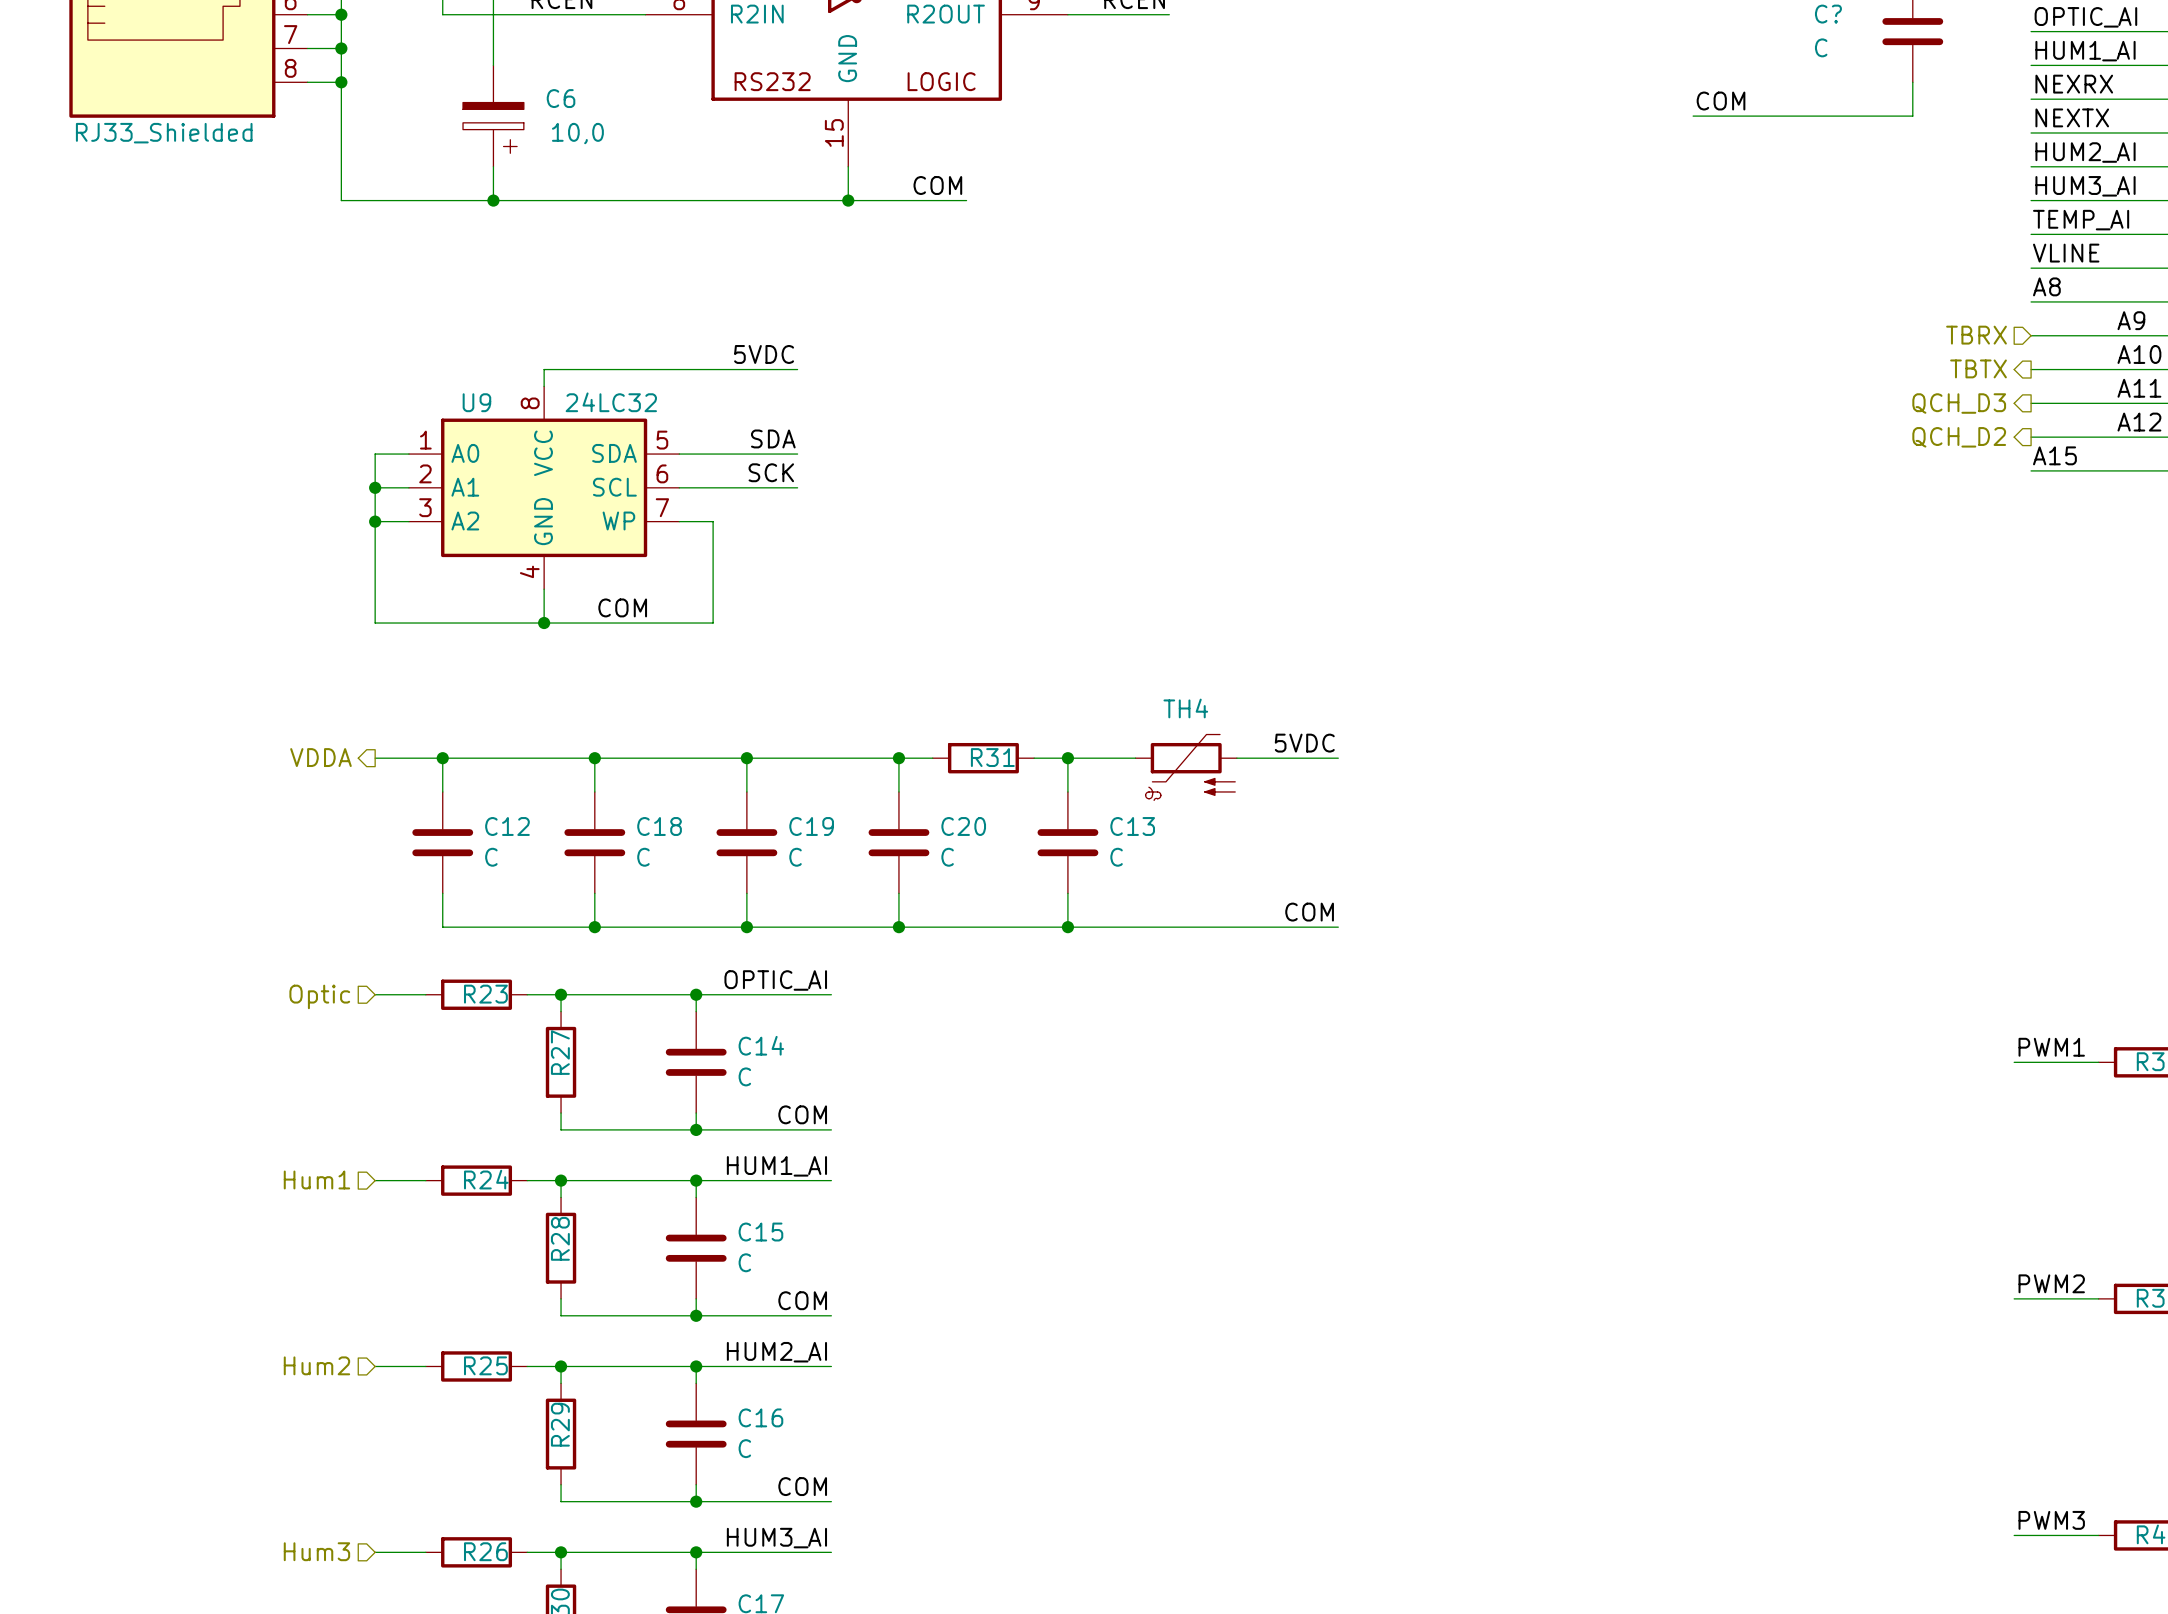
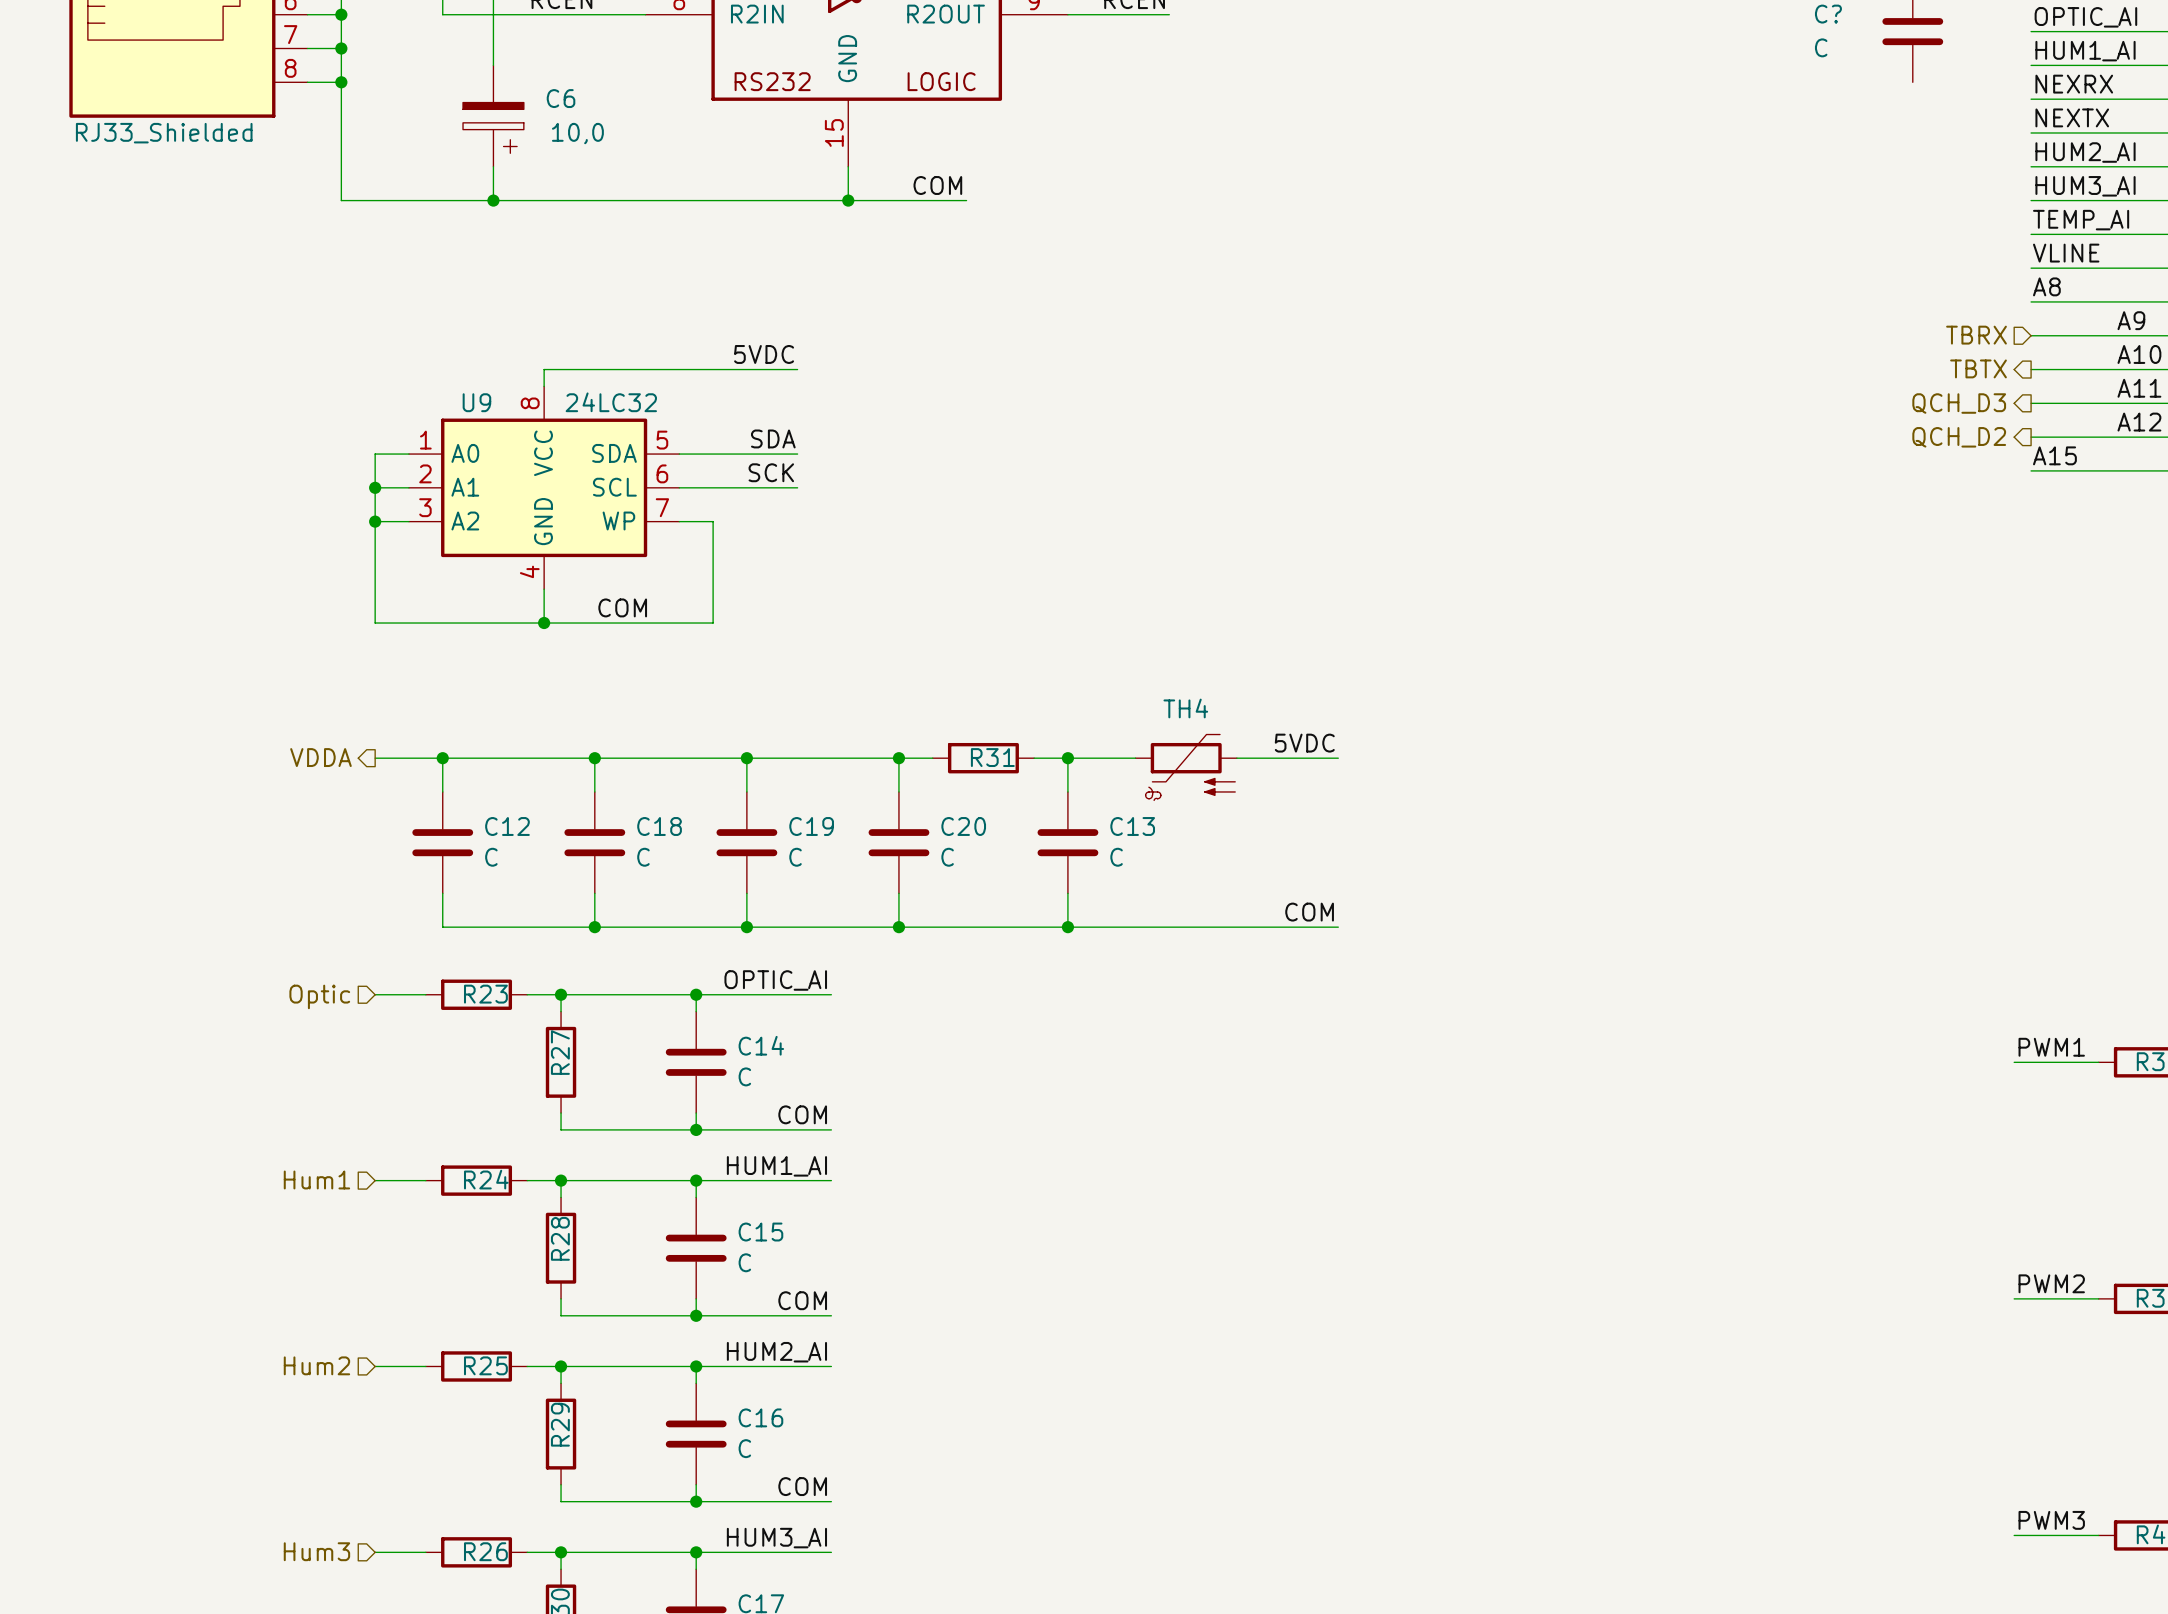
wire: (1912, 82) (1912, 116) (1693, 116) -> none
label: COM (1721, 101) -> none

